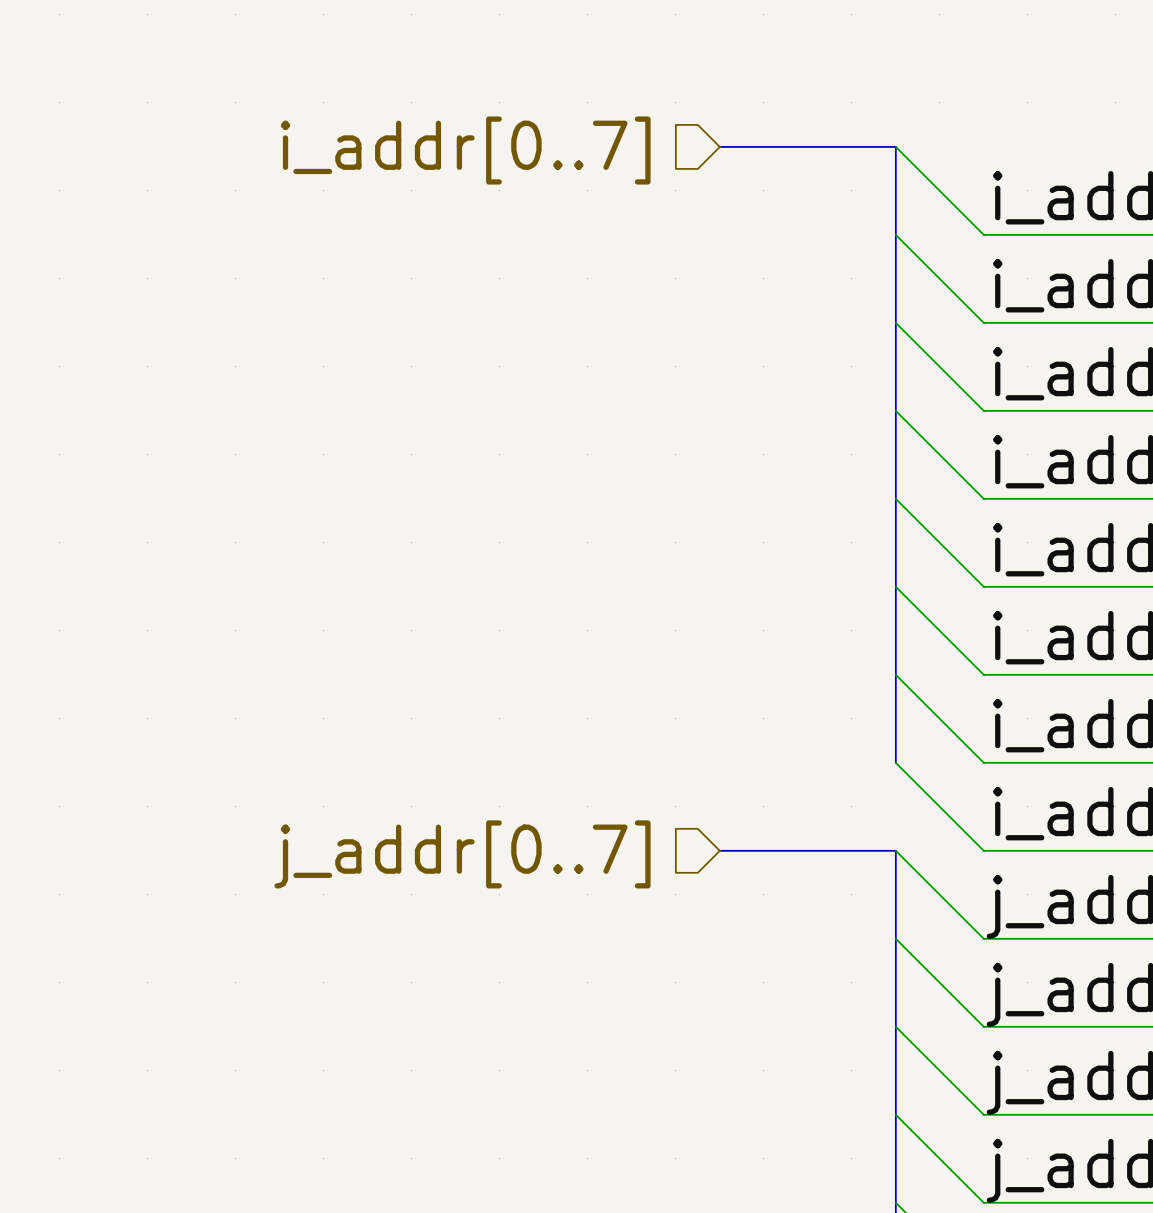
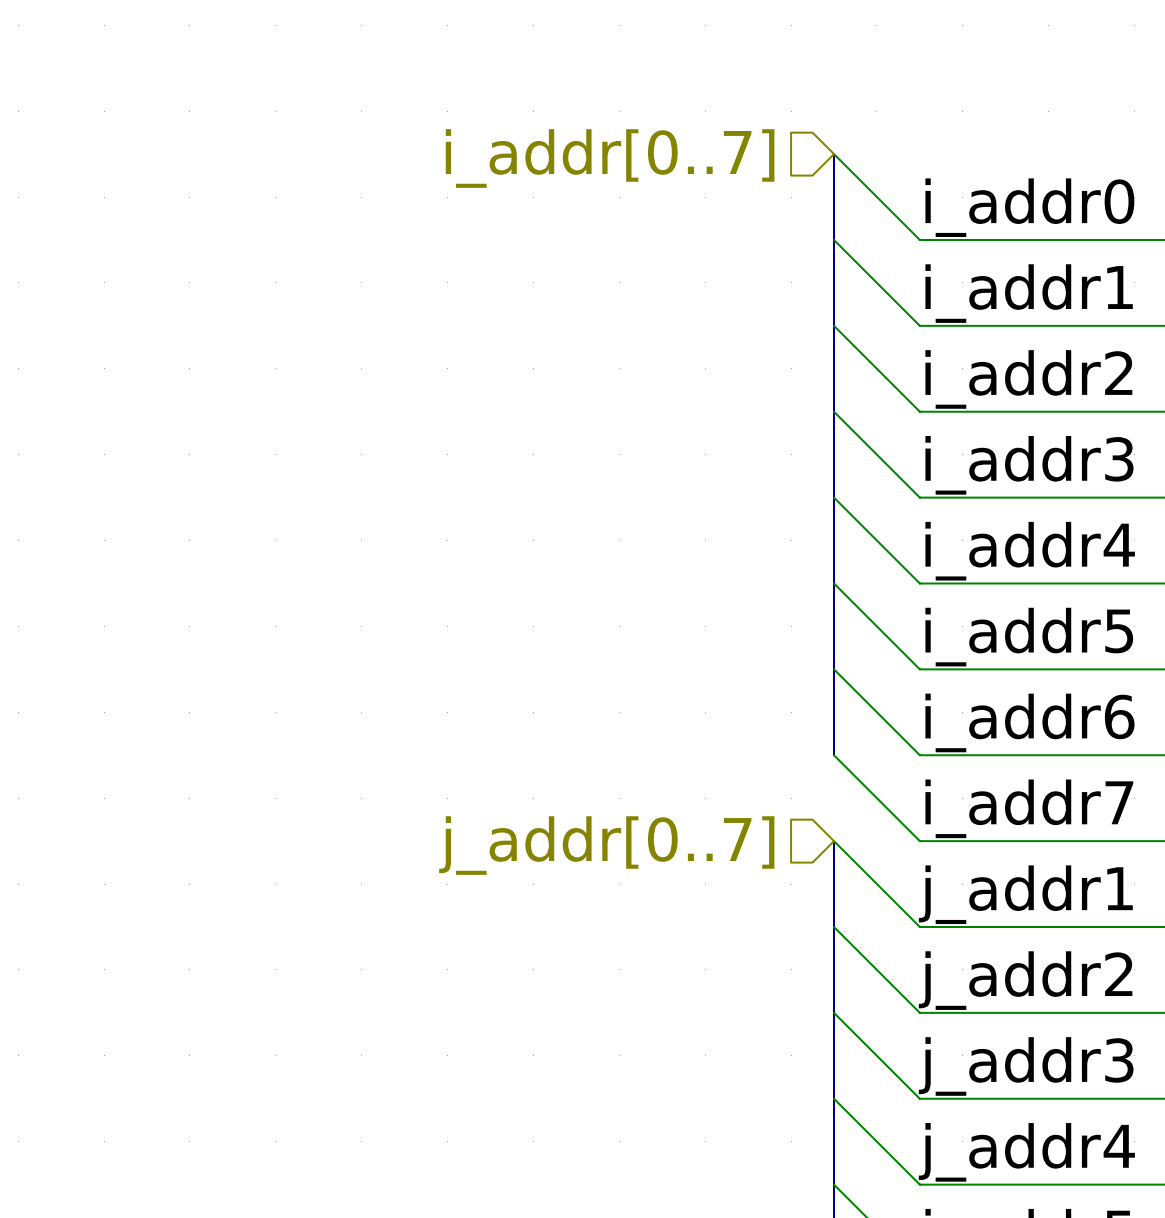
bus: (719, 146) (895, 146) -> none
hierarchical label position: i_addr[0..7] (465, 150) -> i_addr[0..7] (610, 158)
bus: (719, 850) (895, 850) -> none
hierarchical label position: j_addr[0..7] (462, 854) -> j_addr[0..7] (606, 845)

